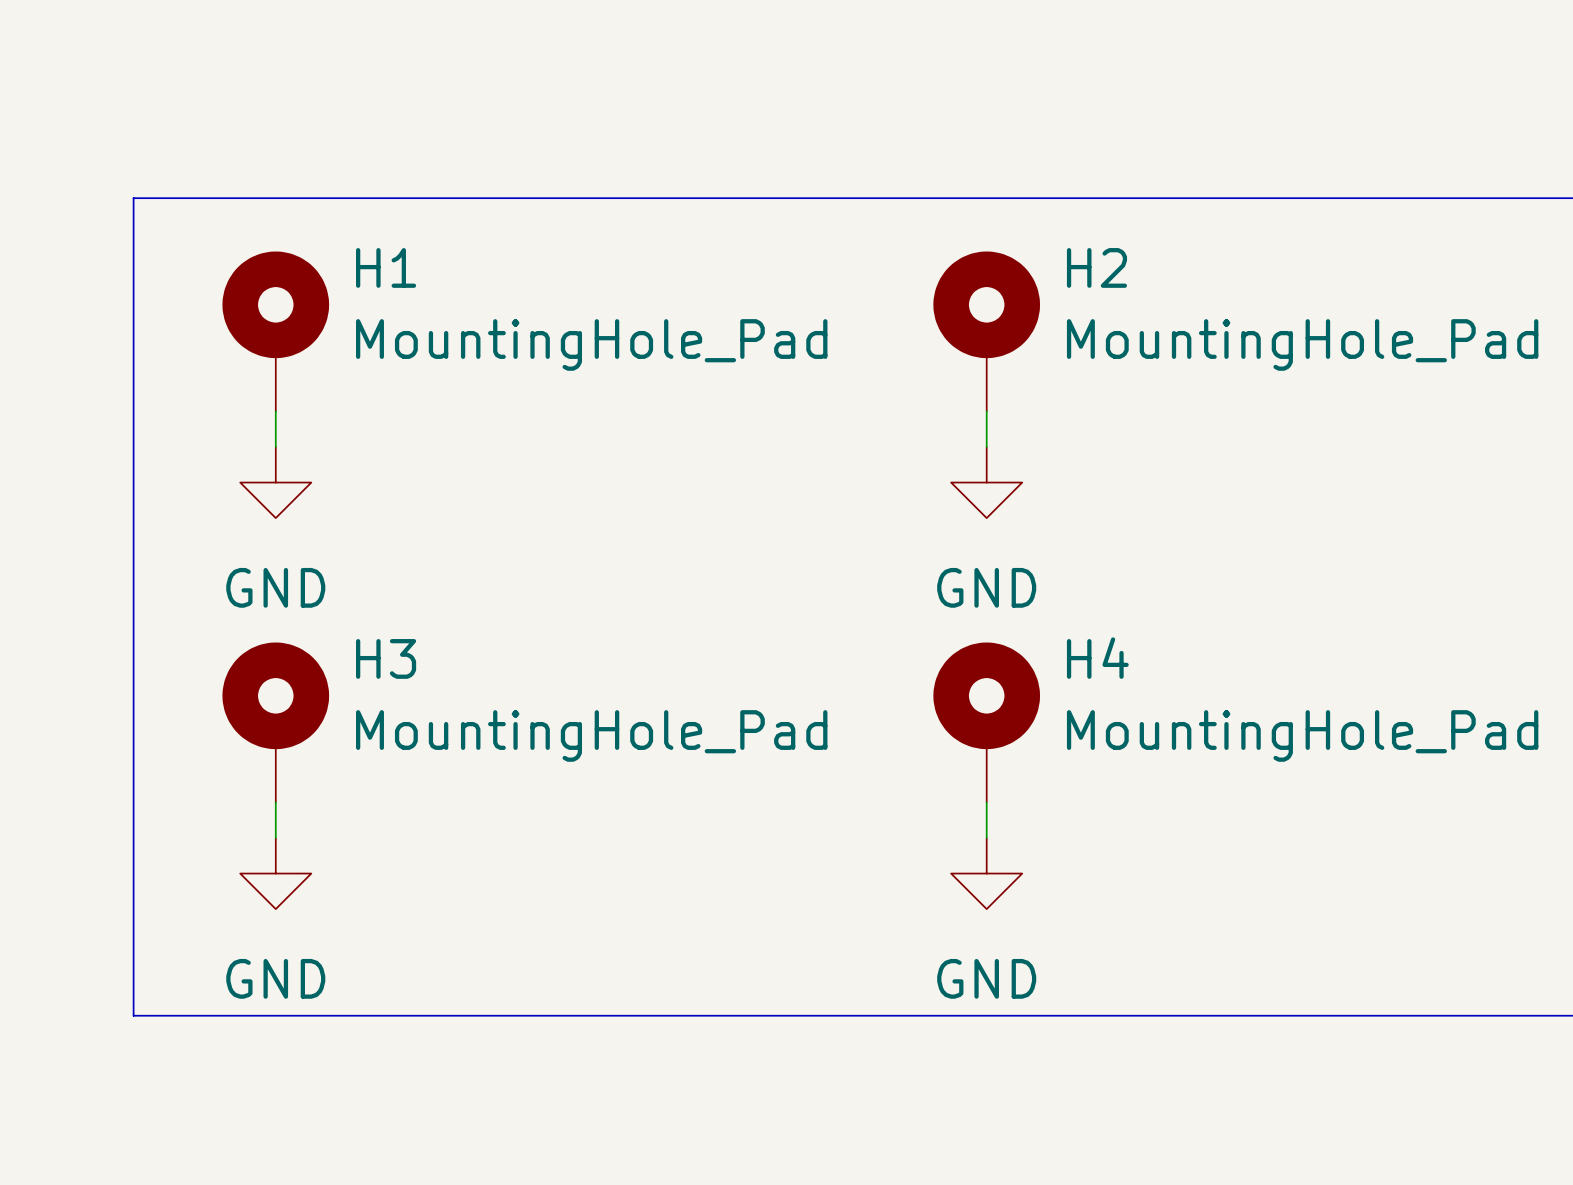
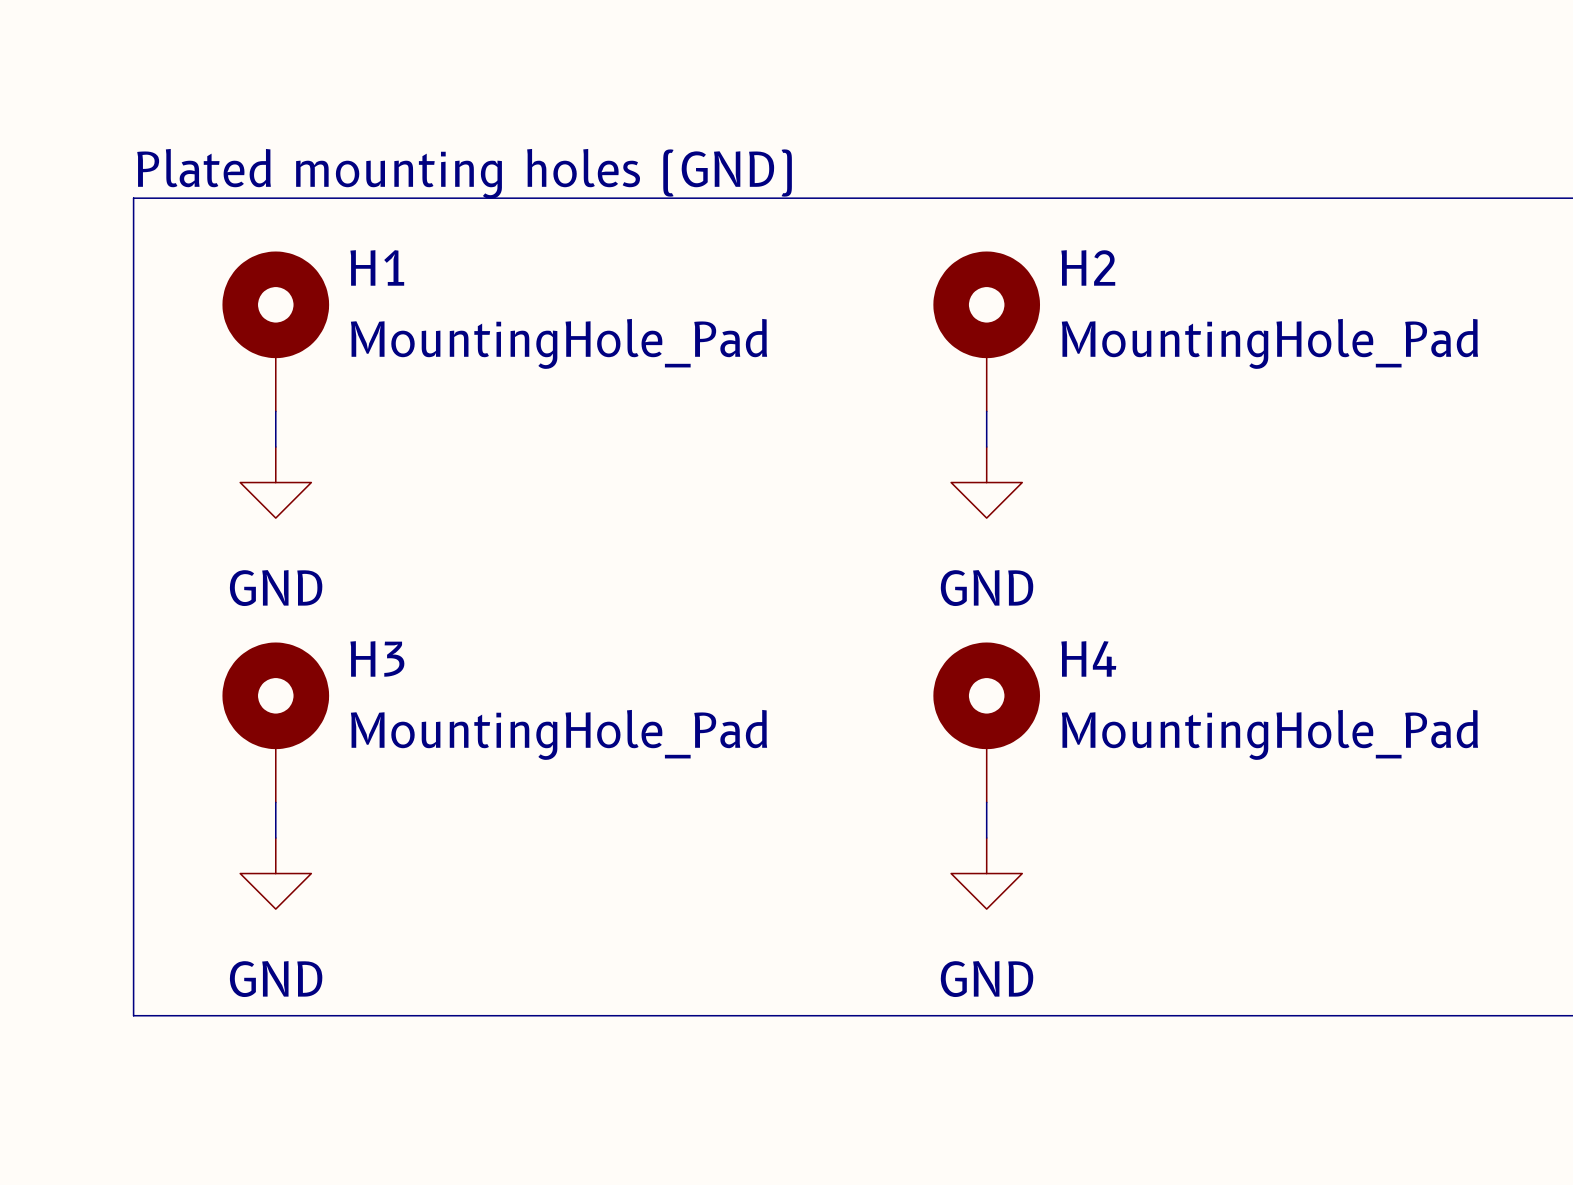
text: none -> Plated mounting holes (GND) (464, 173)

